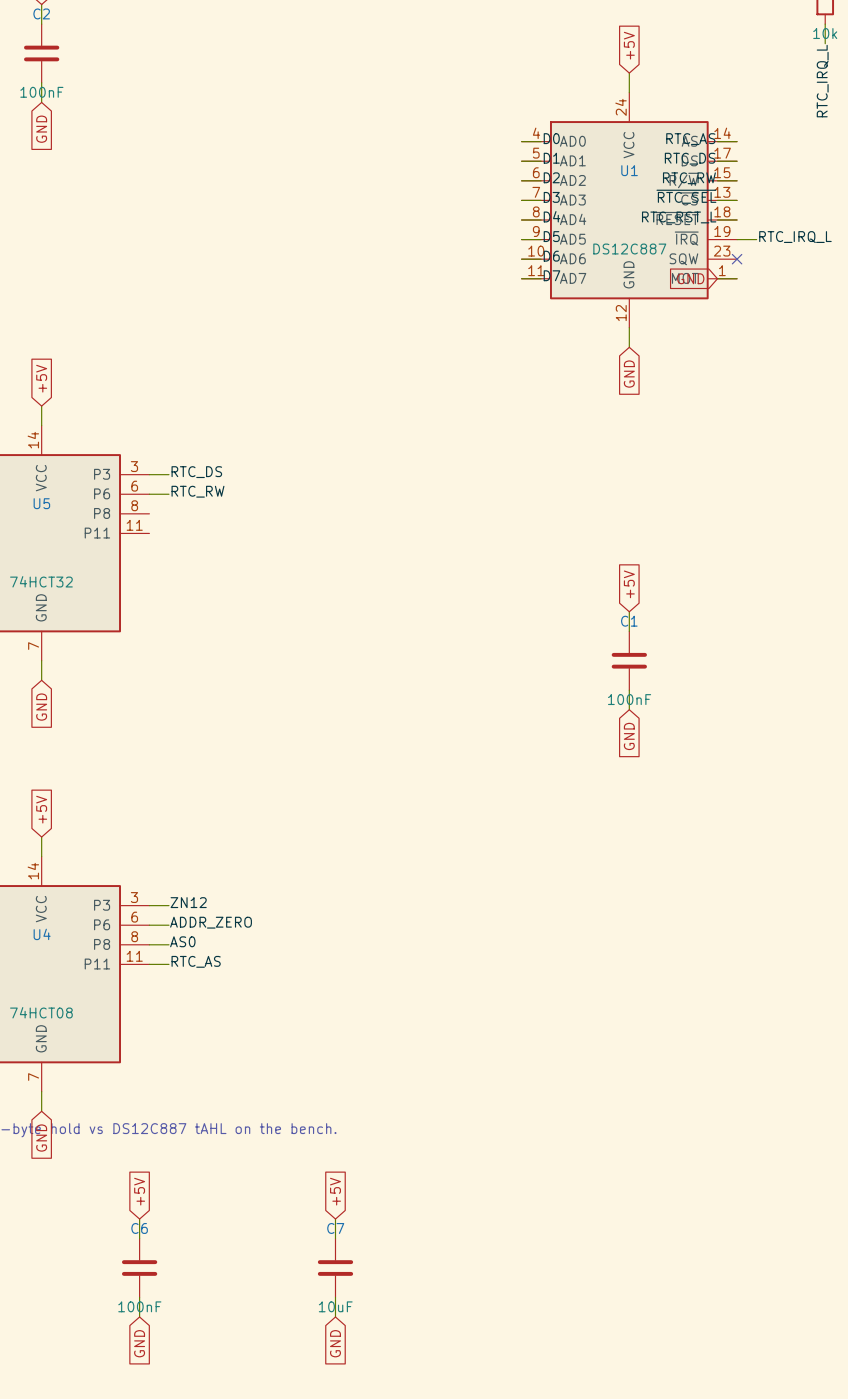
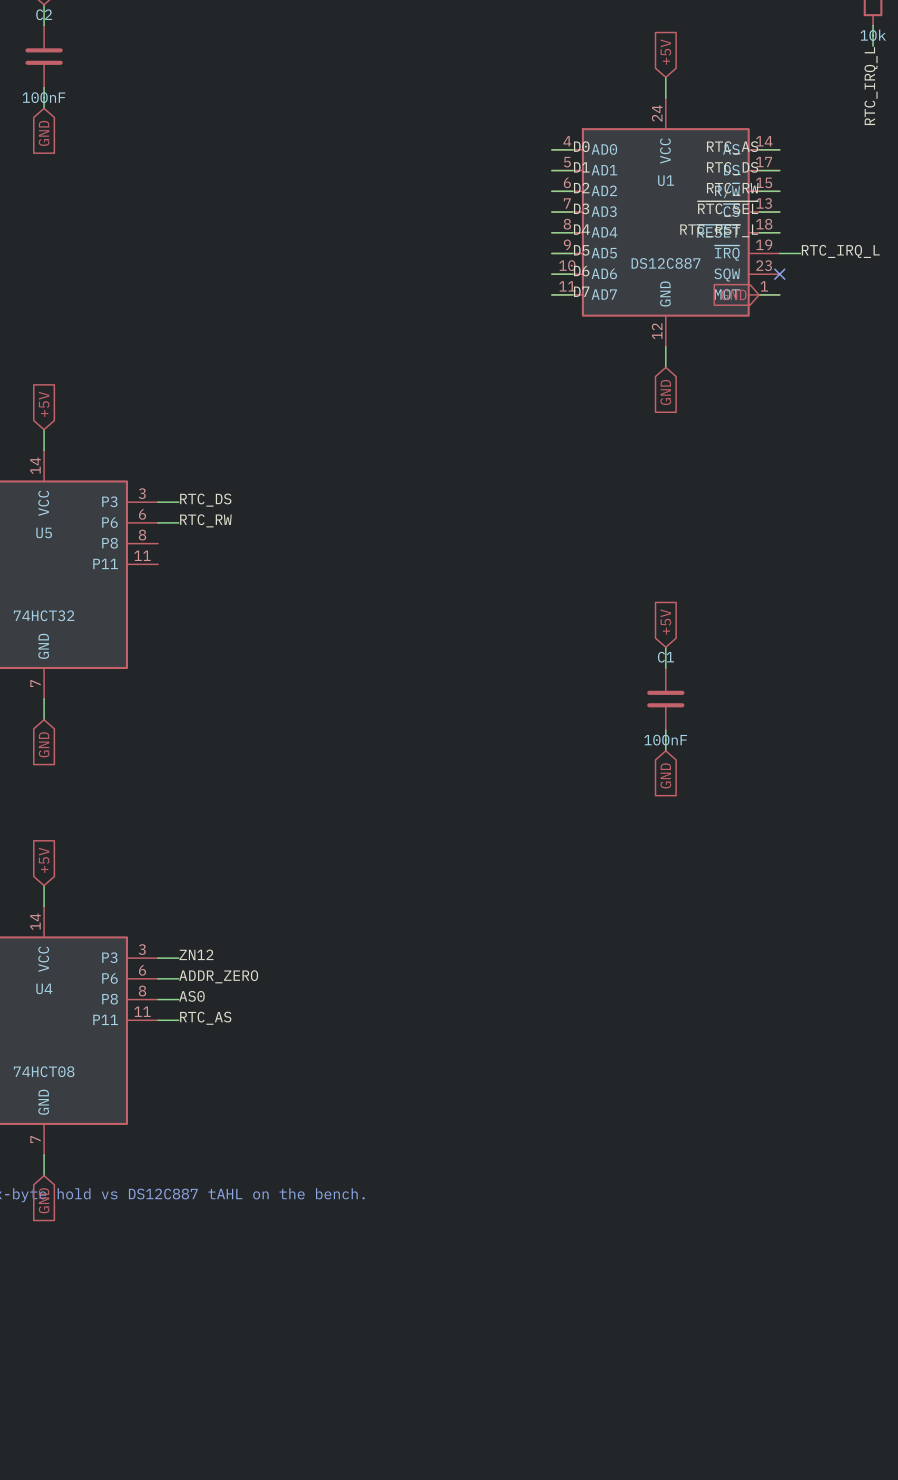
global label: +5V (139, 1191) -> none
global label: +5V (335, 1191) -> none
wire: (139, 1219) (139, 1238) -> none
wire: (335, 1219) (335, 1238) -> none
C6: 100nF (139, 1268) -> none
C7: 10uF (335, 1268) -> none
wire: (139, 1297) (139, 1316) -> none
wire: (335, 1297) (335, 1316) -> none
global label: GND (139, 1343) -> none
global label: GND (335, 1343) -> none

